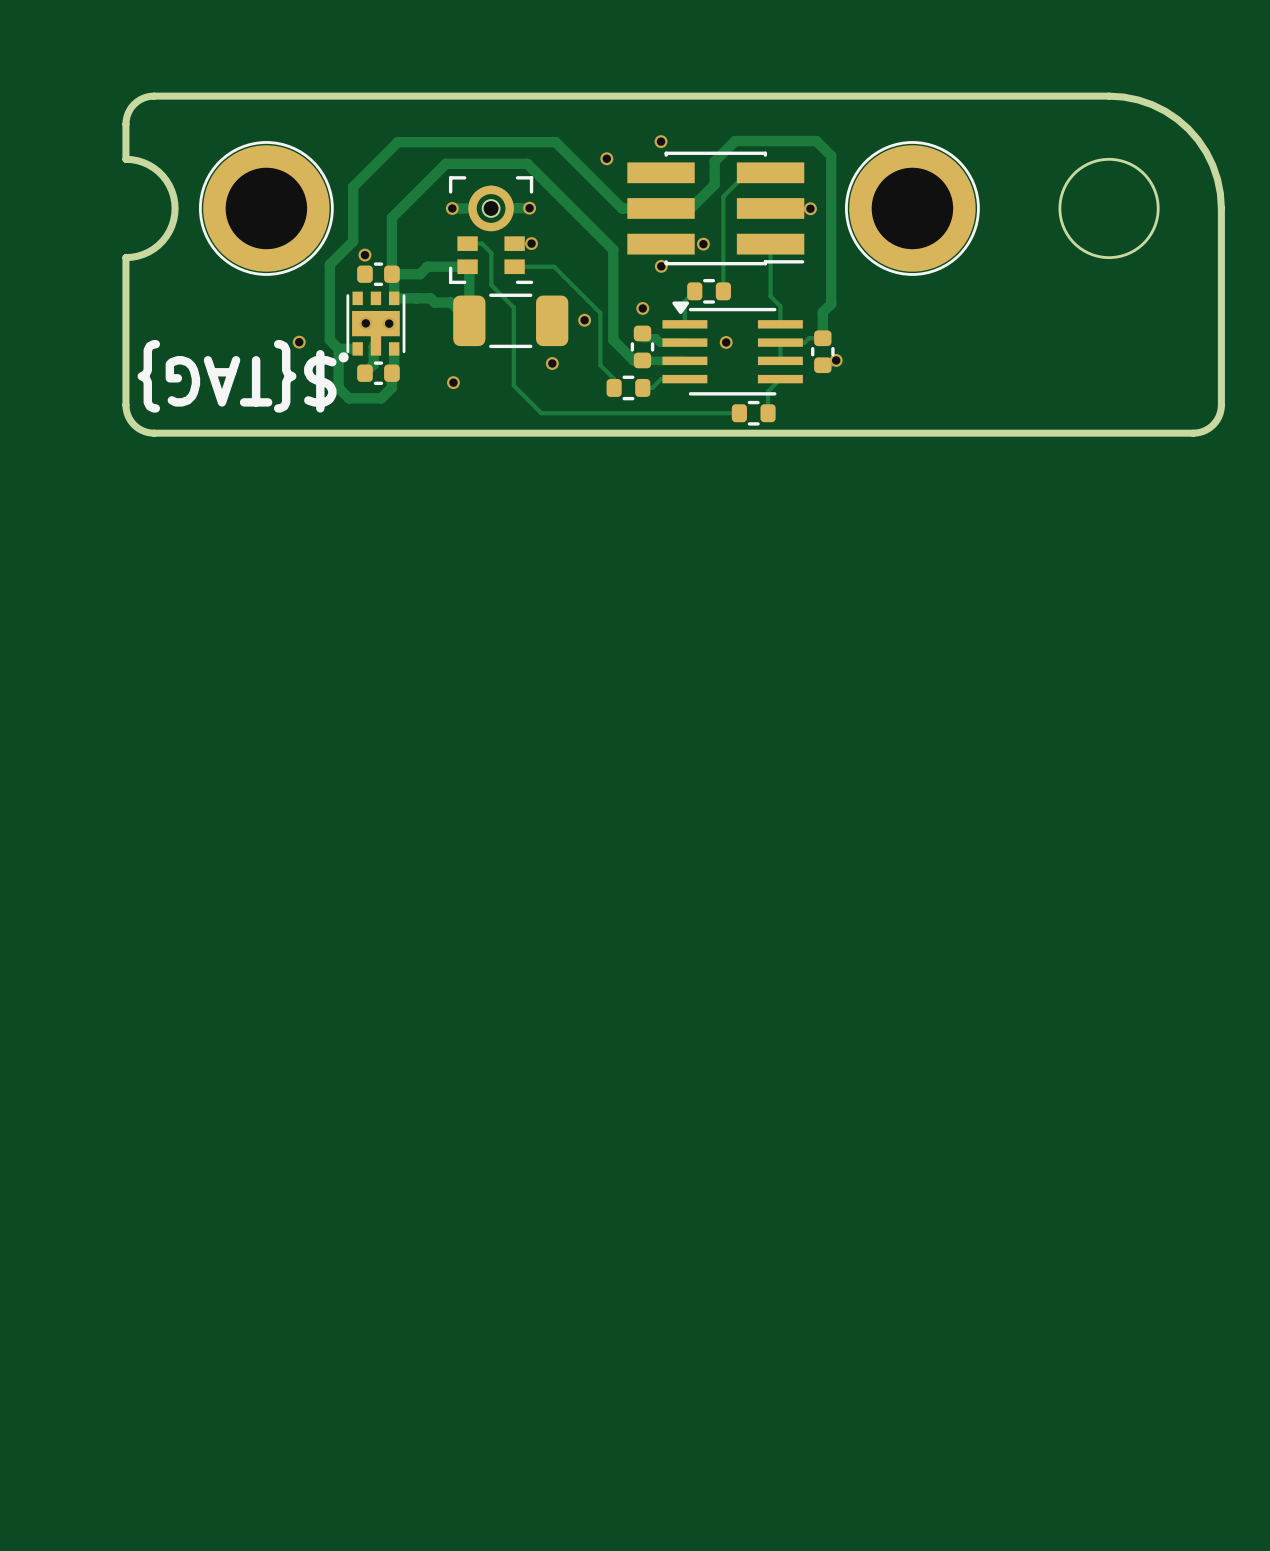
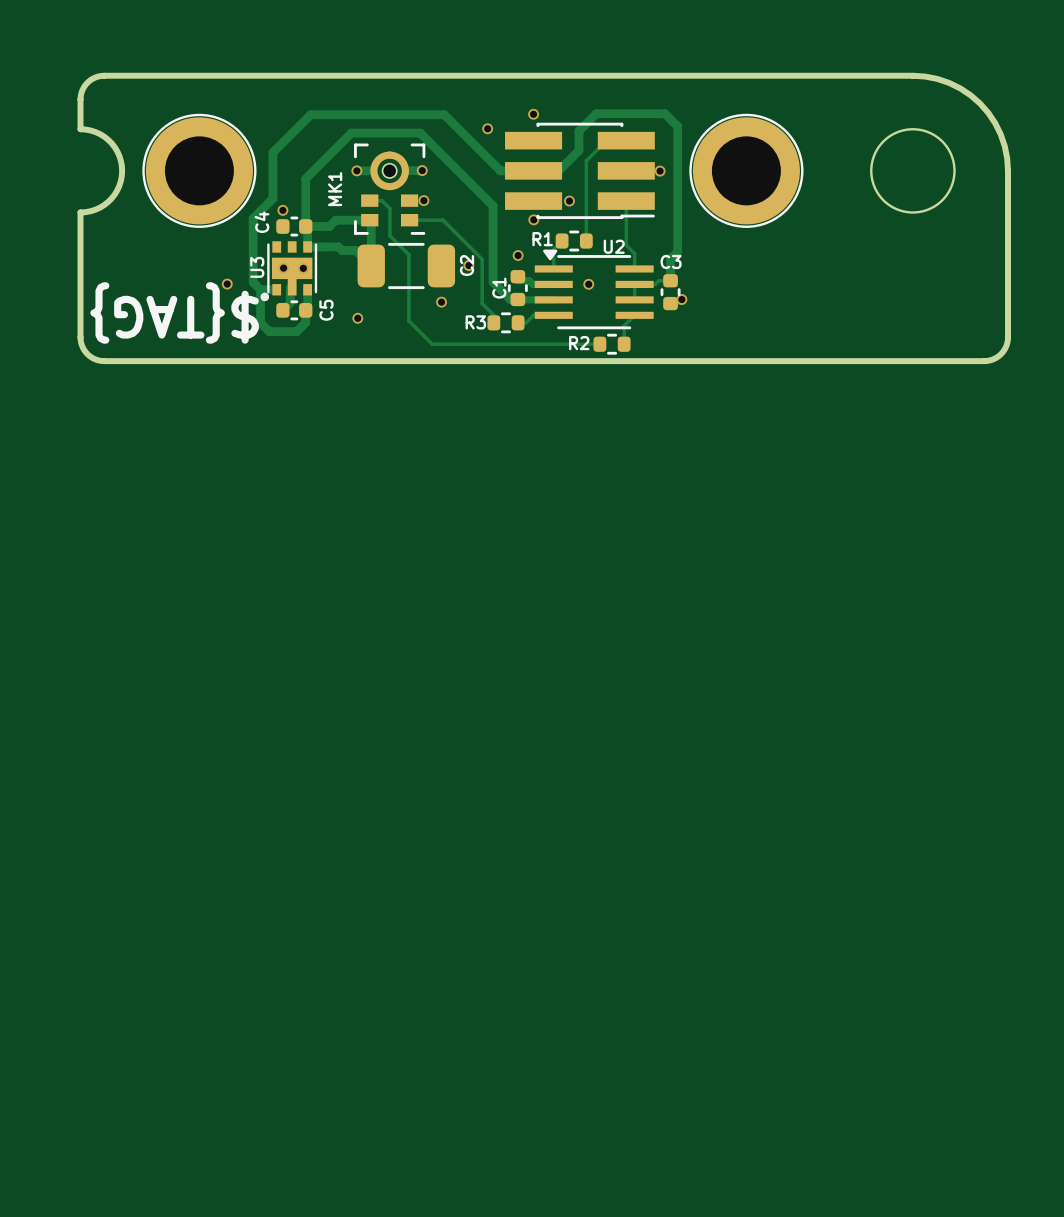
MK1 name: none -> MK1 (335, 189)
C4 name: none -> C4 (261, 222)
R1 name: none -> R1 (542, 239)
U2 name: none -> U2 (614, 246)
C3 name: none -> C3 (671, 261)
C2 name: none -> C2 (467, 265)
U3 name: none -> U3 (257, 267)
C1 name: none -> C1 (499, 288)
C5 name: none -> C5 (326, 310)
R3 name: none -> R3 (475, 322)
R2 name: none -> R2 (579, 343)

